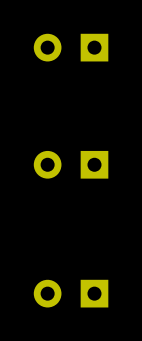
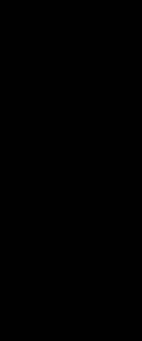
part: (71, 47) -> none
part: (71, 164) -> none
part: (71, 293) -> none

